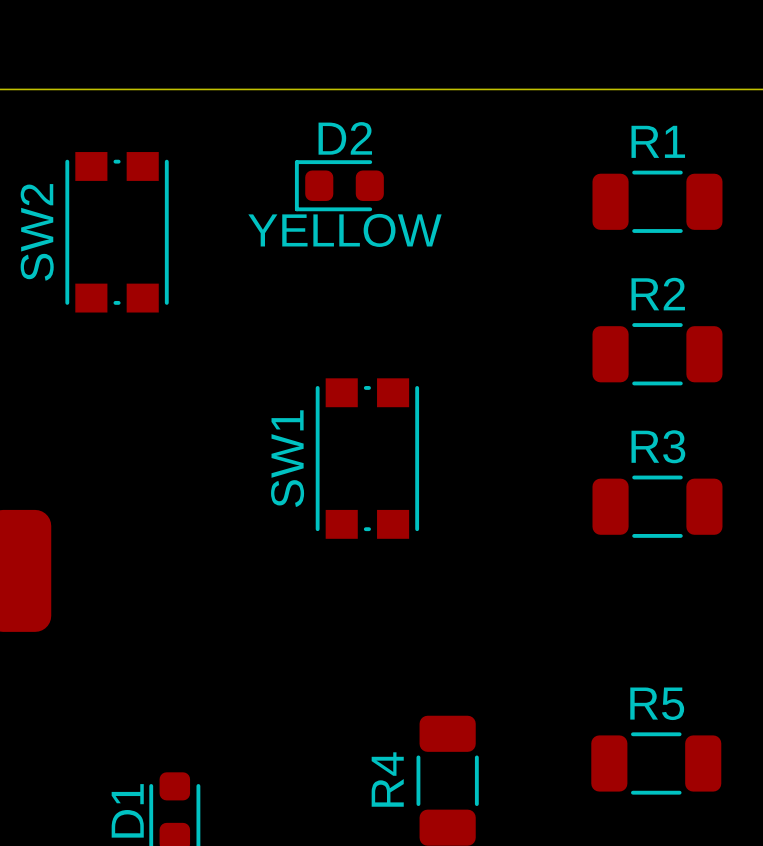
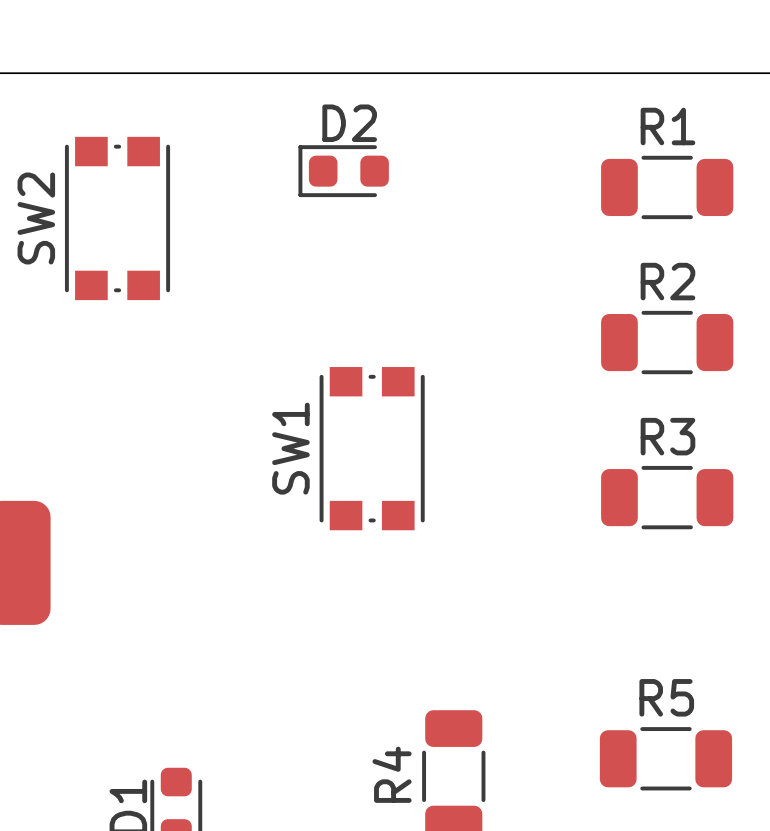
D2 value: YELLOW (344, 230) -> none

